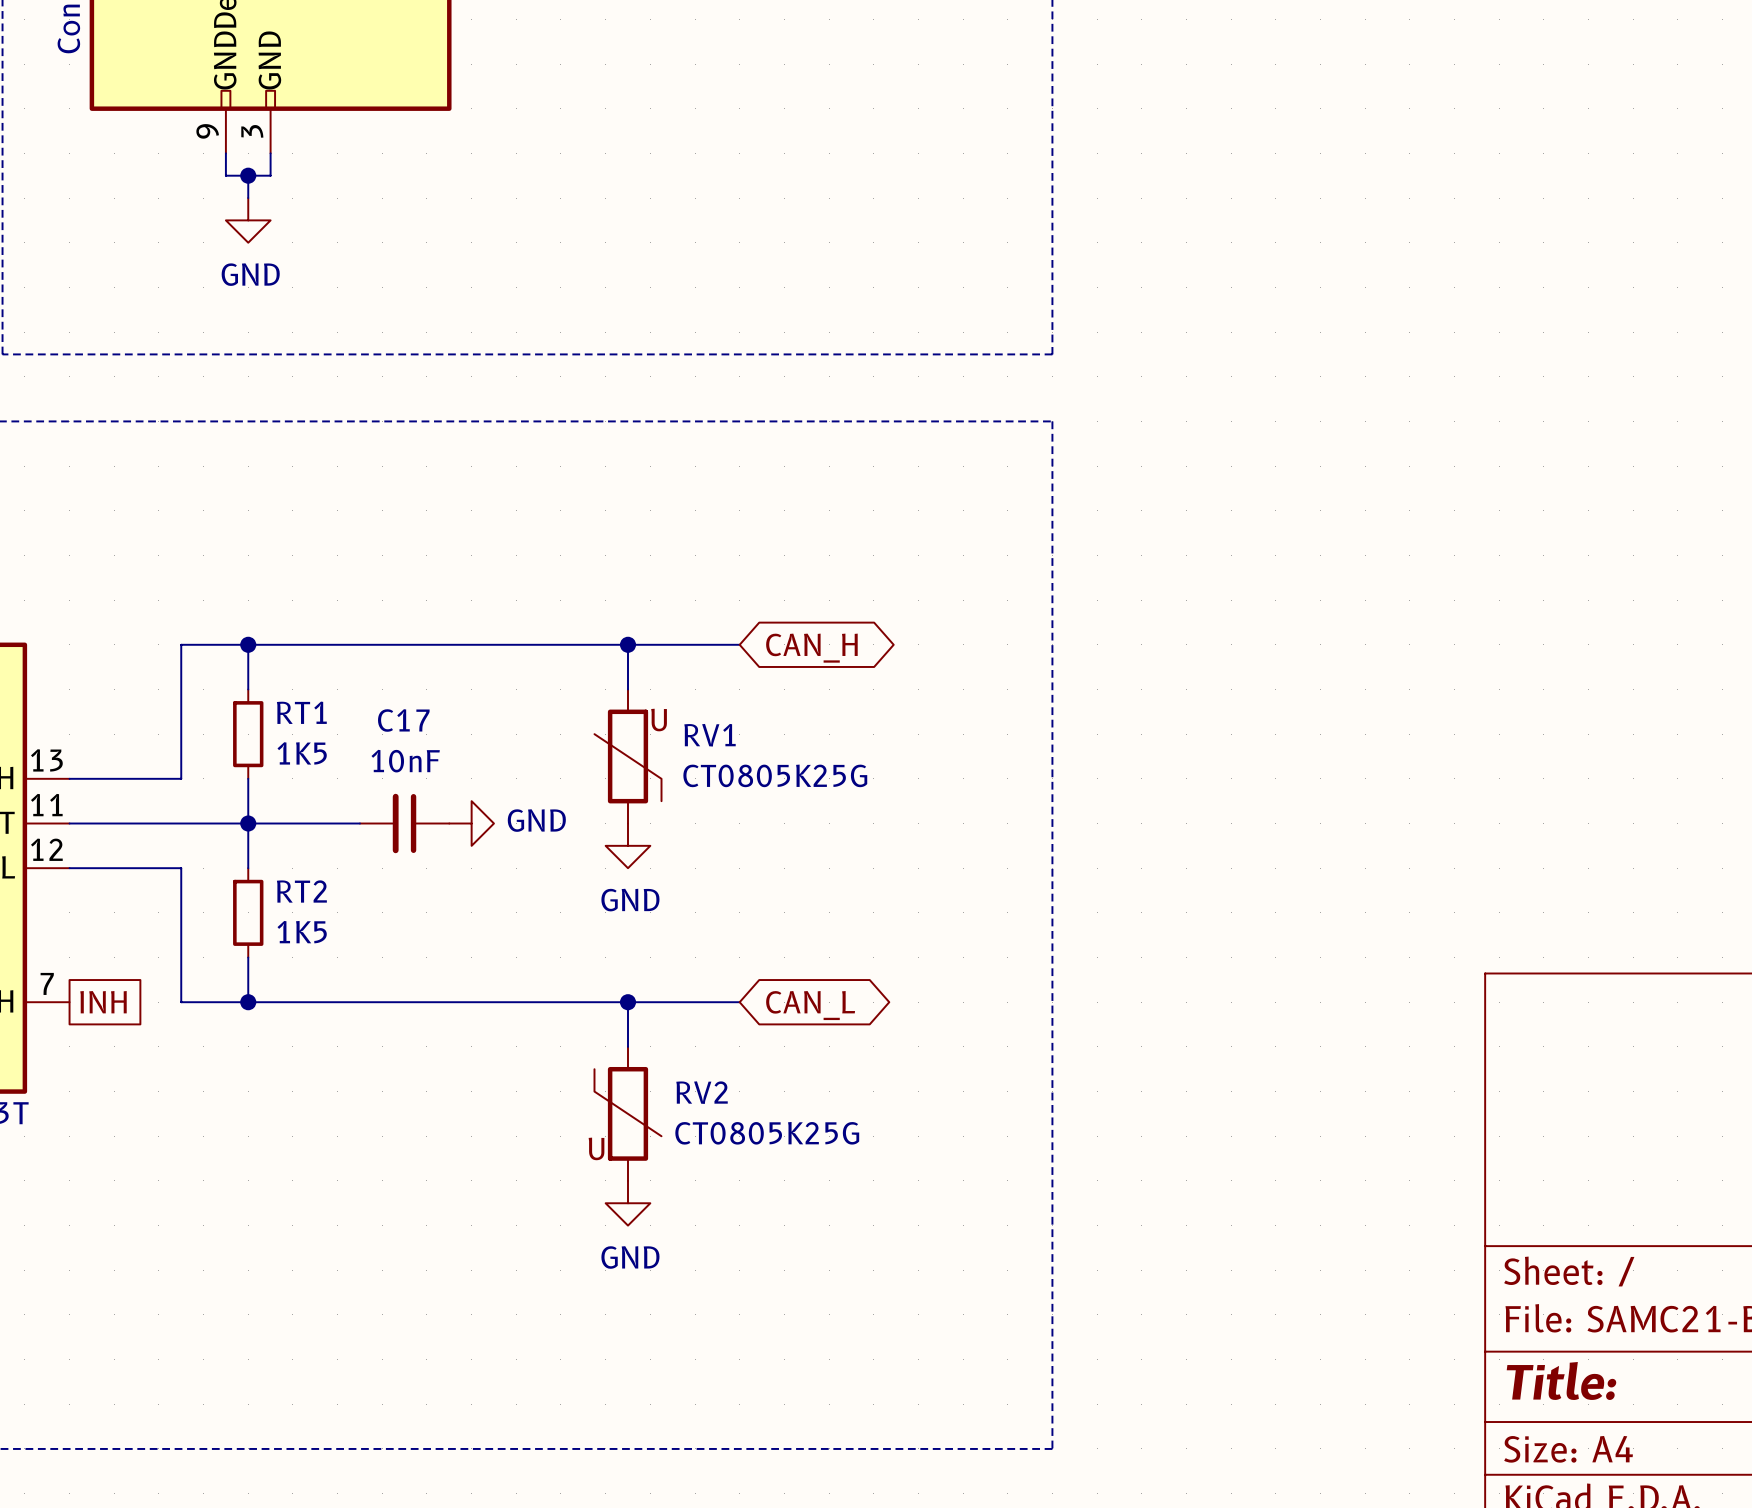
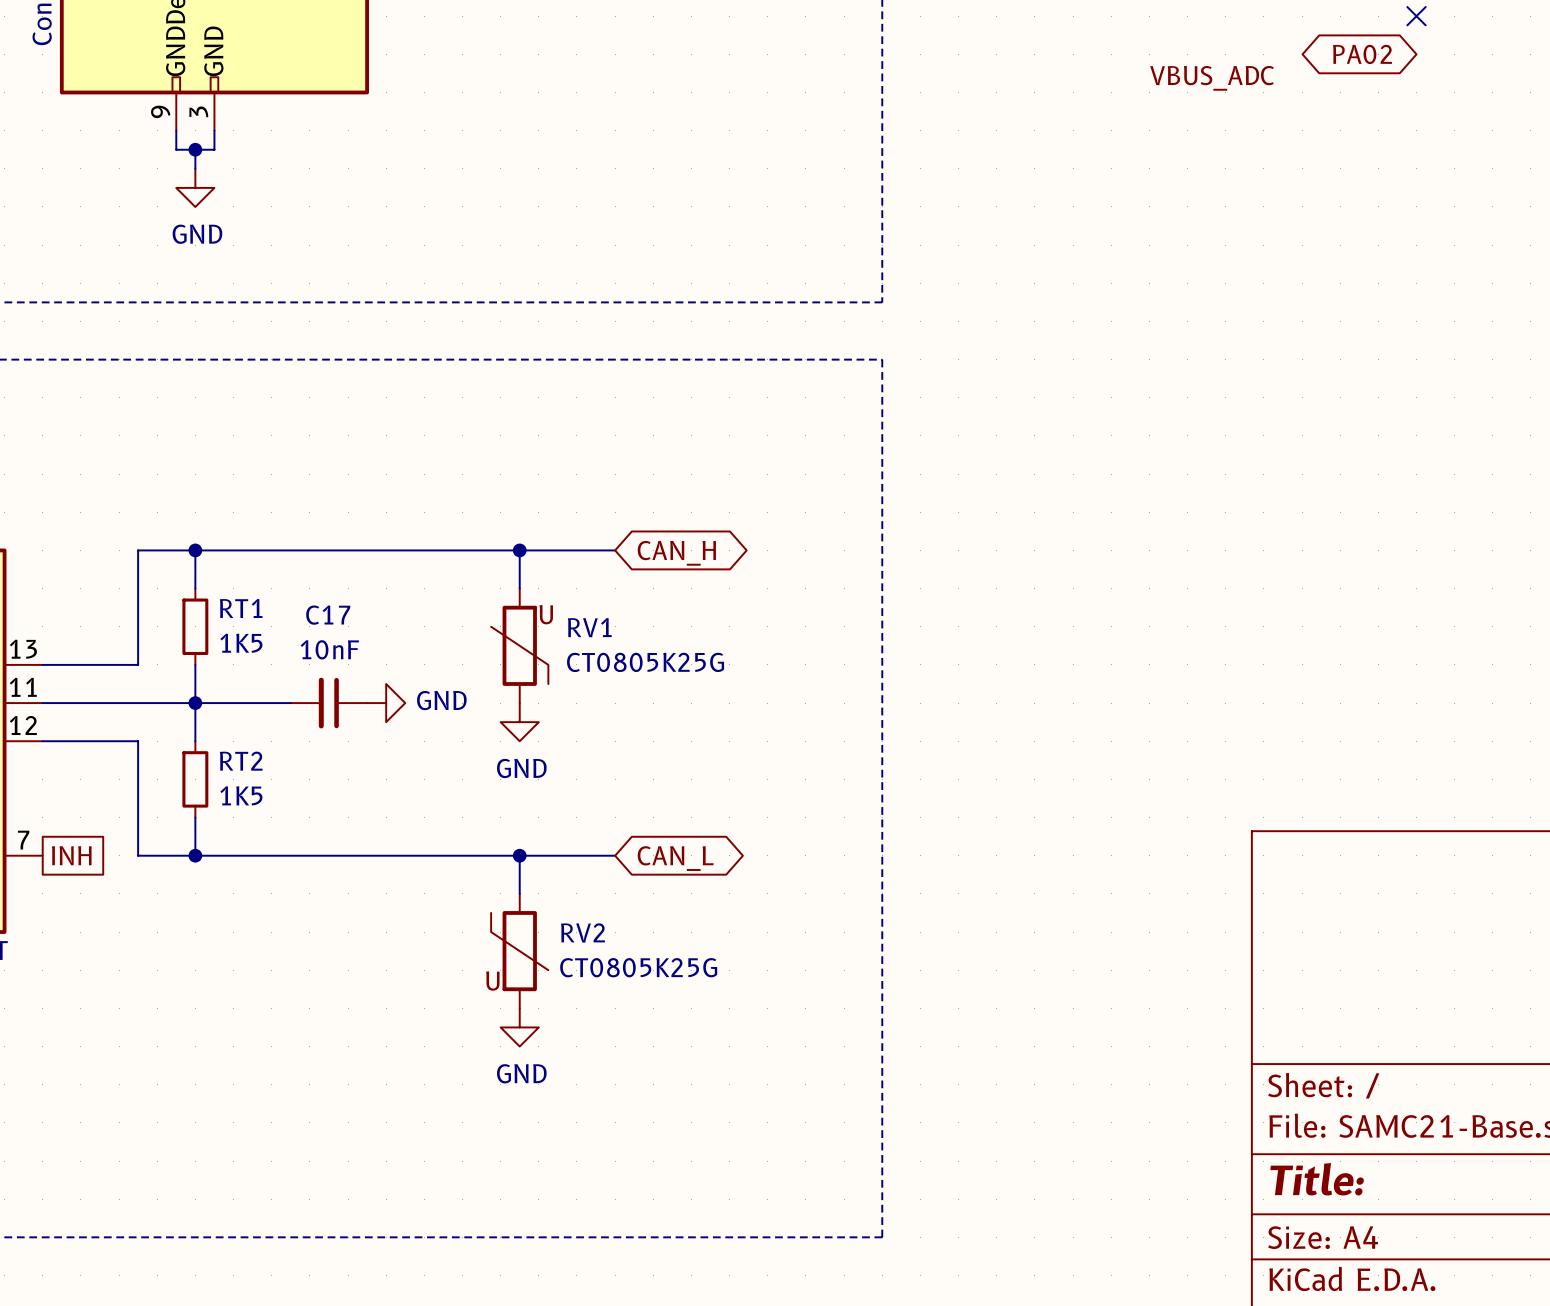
no-connect mark: none -> (1416, 16)
global label: none -> PA02 (1362, 54)
label: none -> VBUS_ADC (1212, 78)

